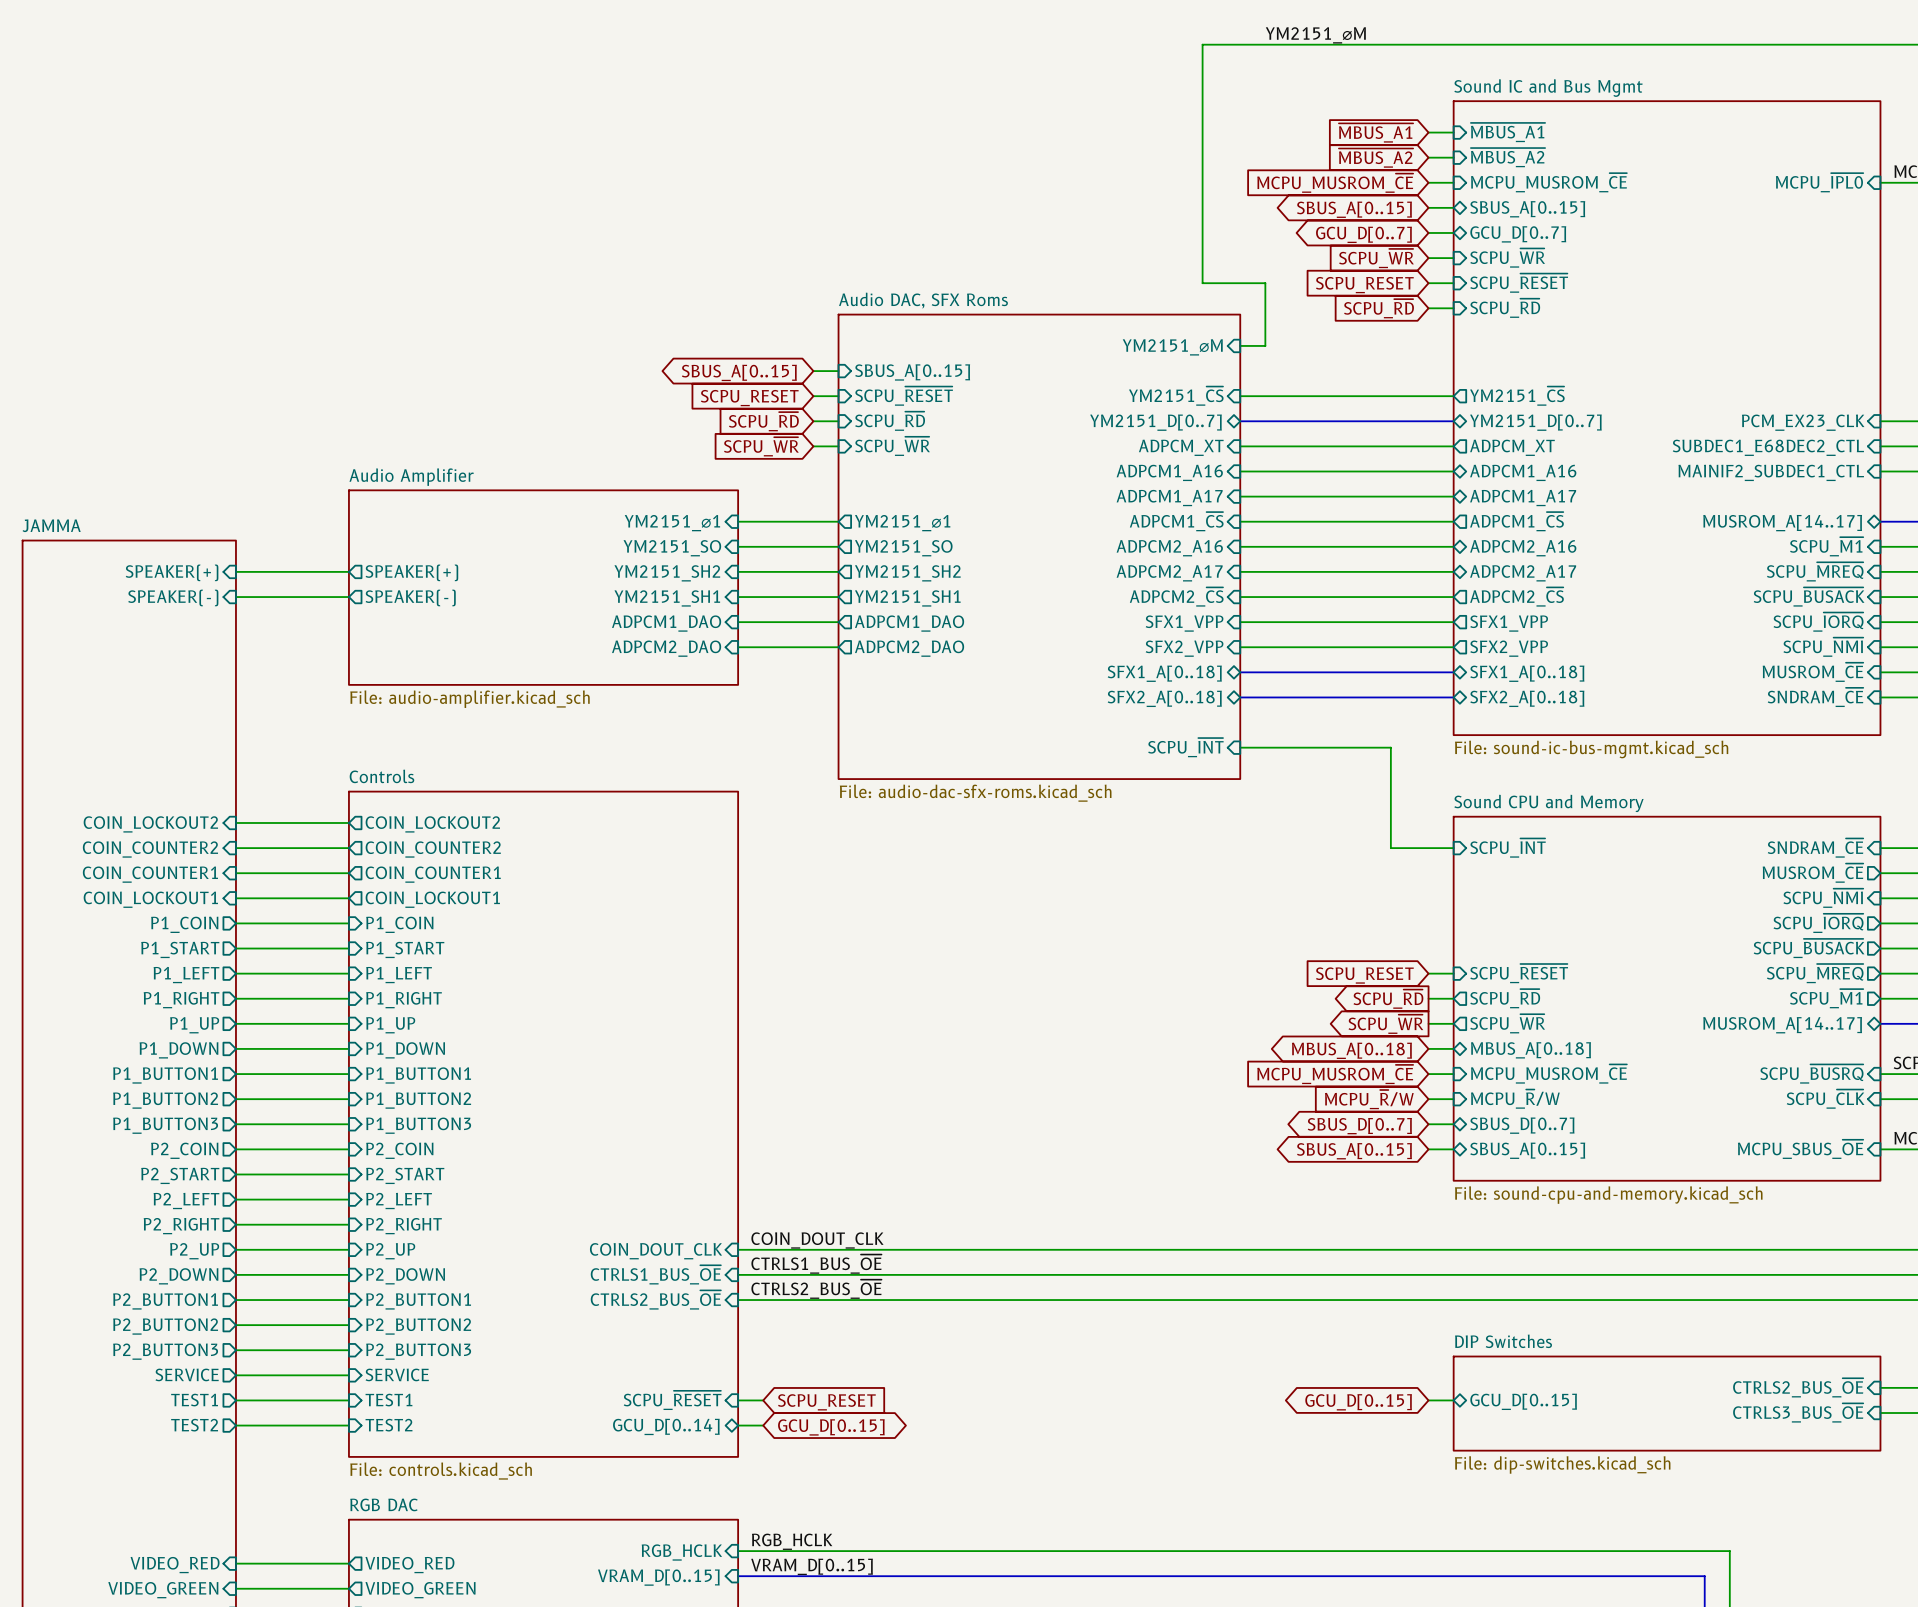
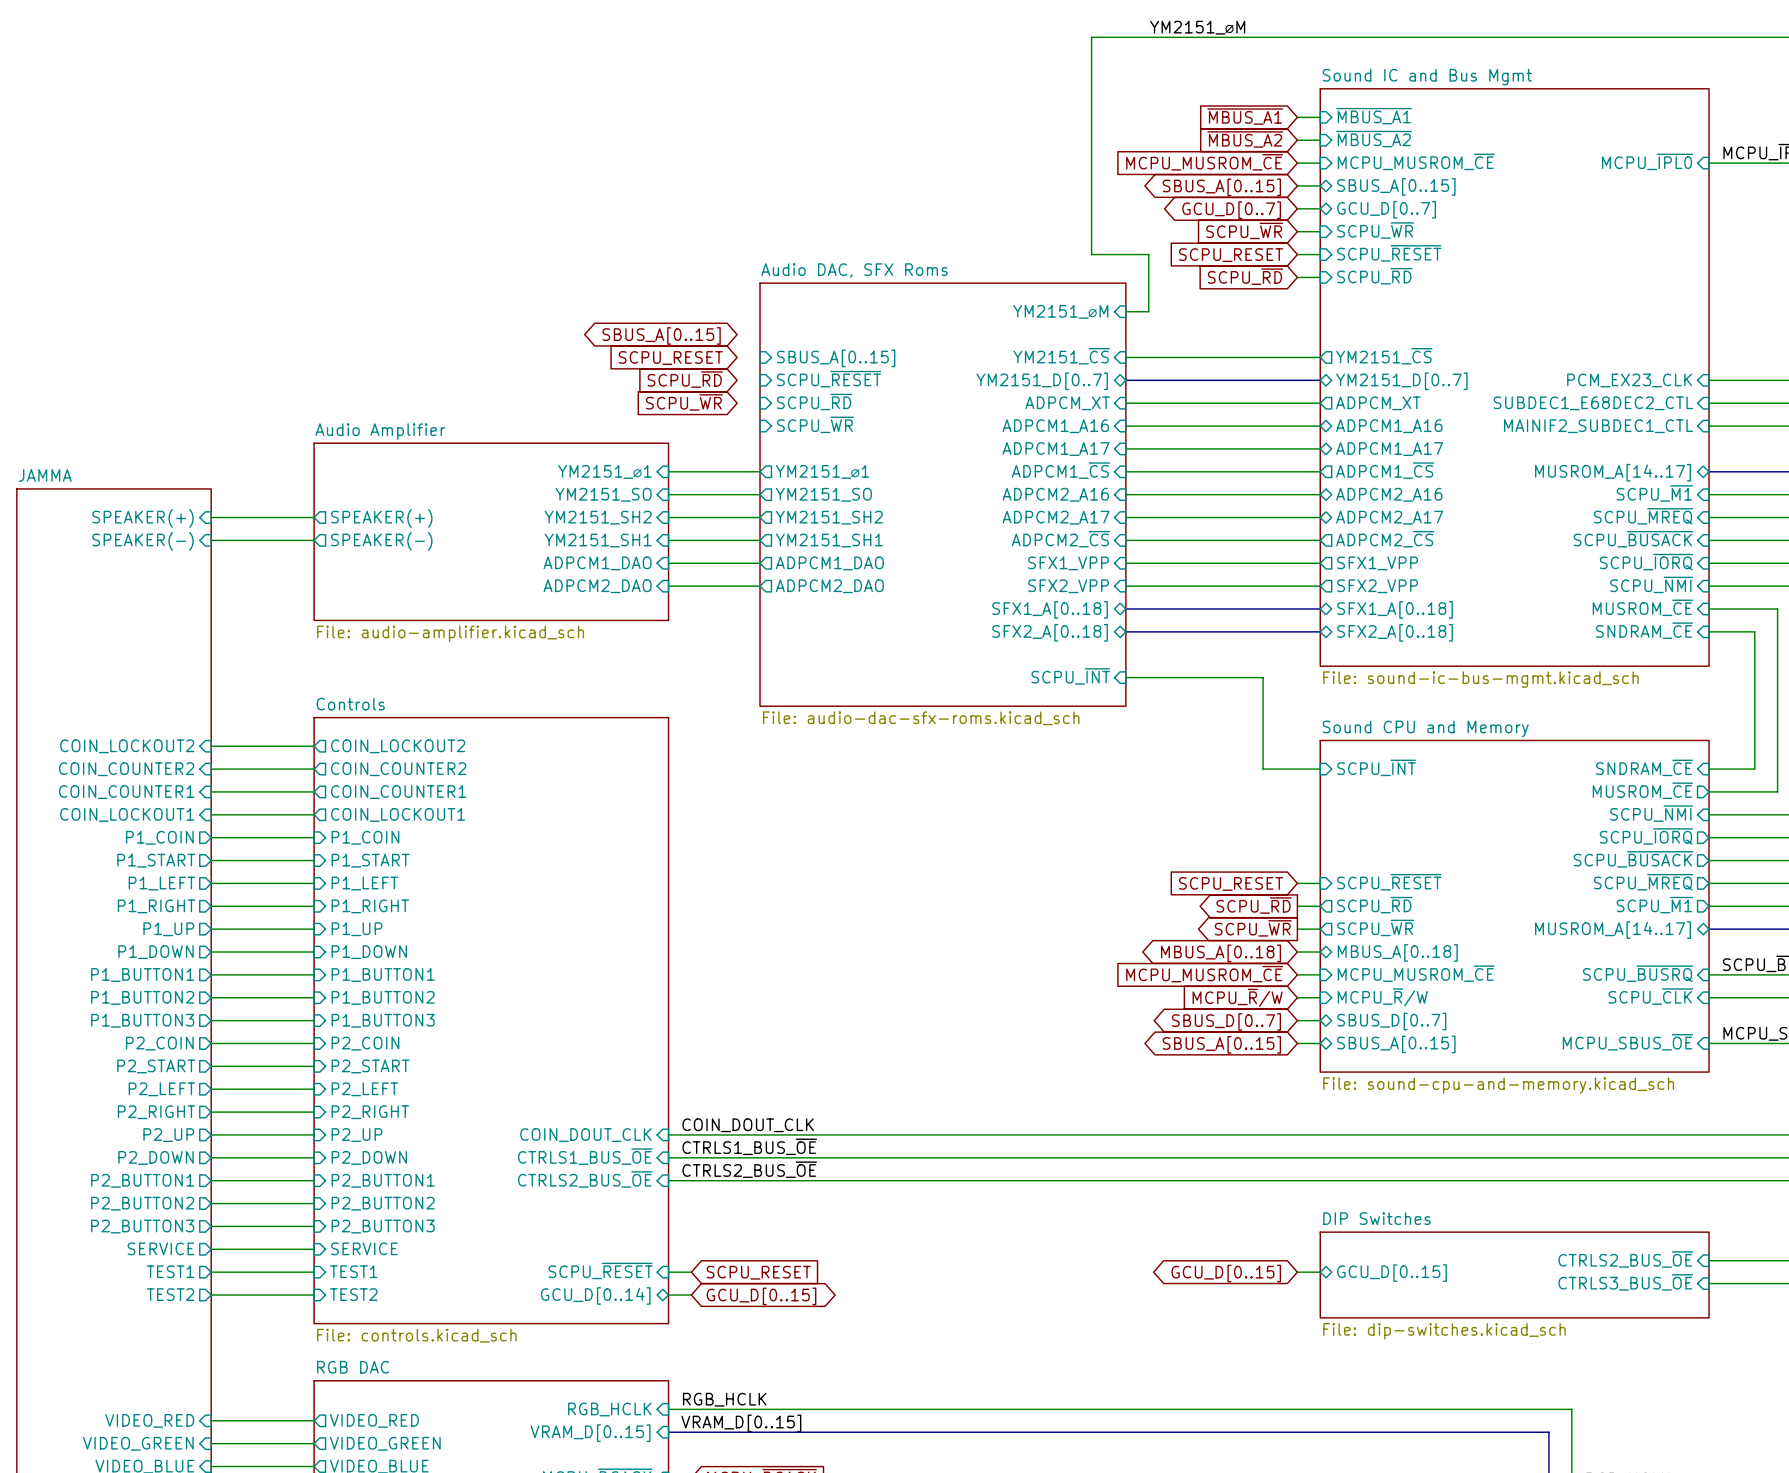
wire: (813, 371) (838, 371) -> none
sheet pin: SBUS_A[0..15] (912, 372) -> none
wire: (813, 396) (838, 396) -> none
sheet pin: SCPU_~{RESET} (904, 396) -> SBUS_A[0..15] (836, 358)
wire: (813, 421) (838, 421) -> none
sheet pin: SCPU_~{RD} (890, 421) -> SCPU_~{RESET} (829, 379)
wire: (813, 446) (838, 446) -> none
sheet pin: SCPU_~{WR} (892, 446) -> SCPU_~{RD} (814, 402)
sheet pin: none -> SCPU_~{WR} (815, 424)

